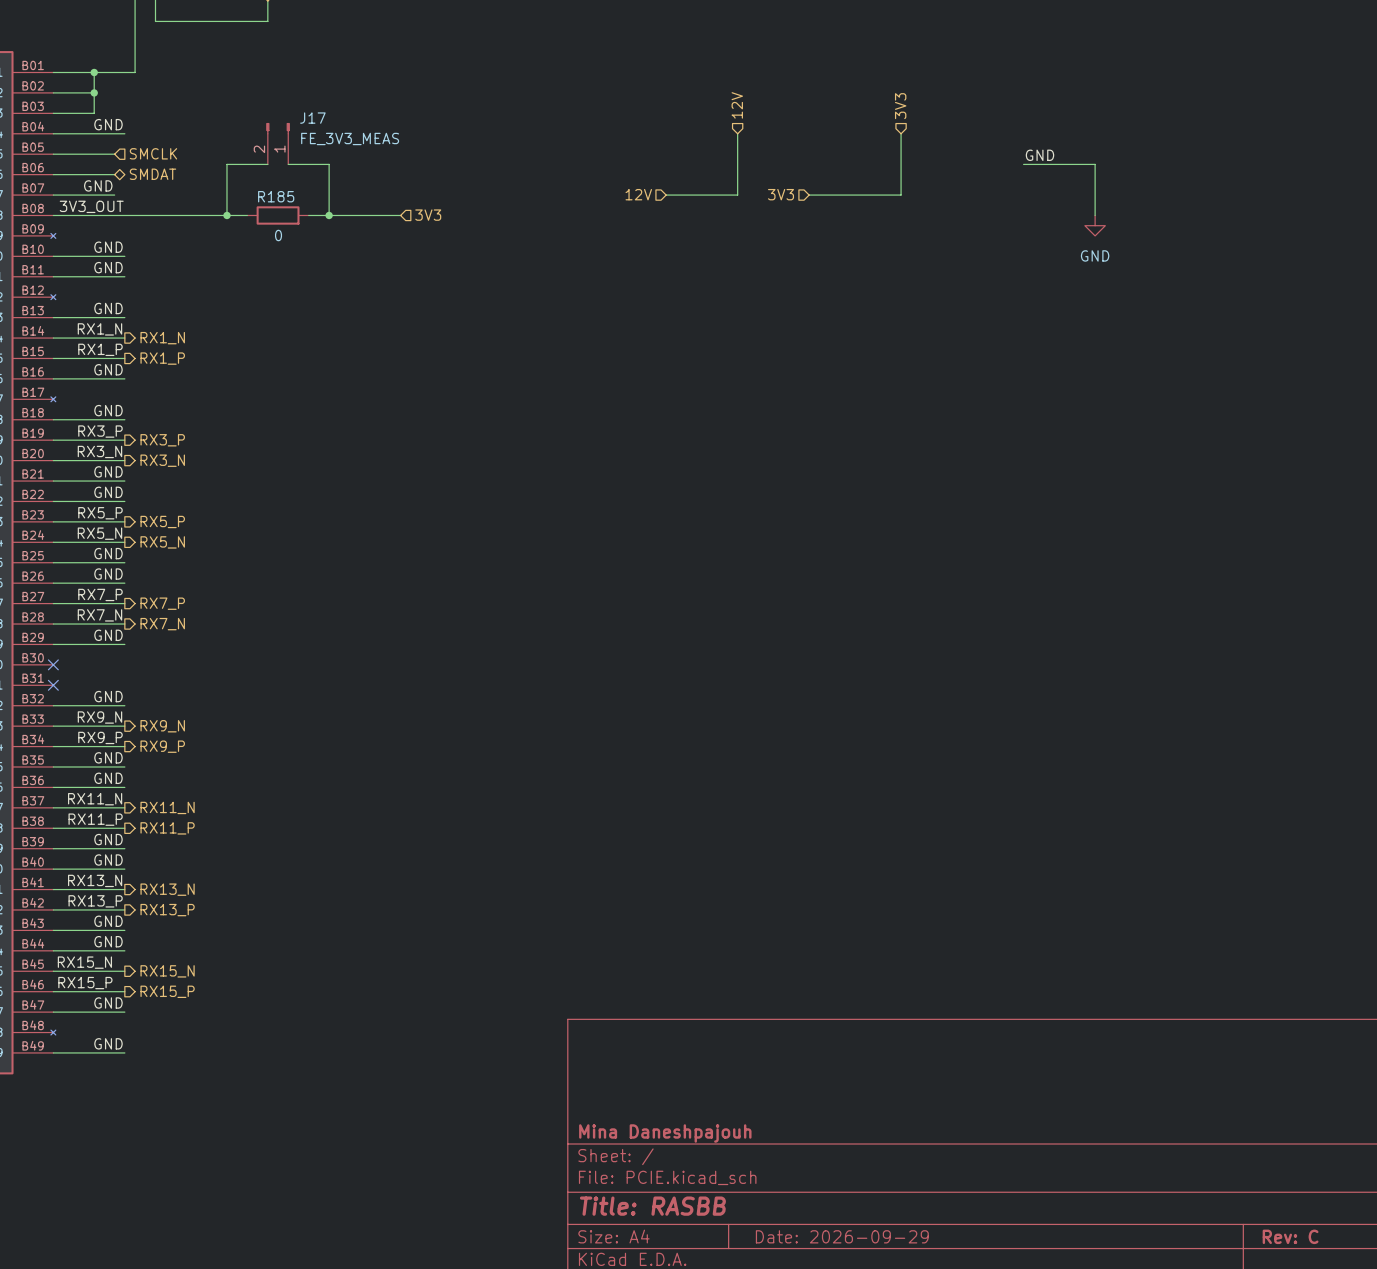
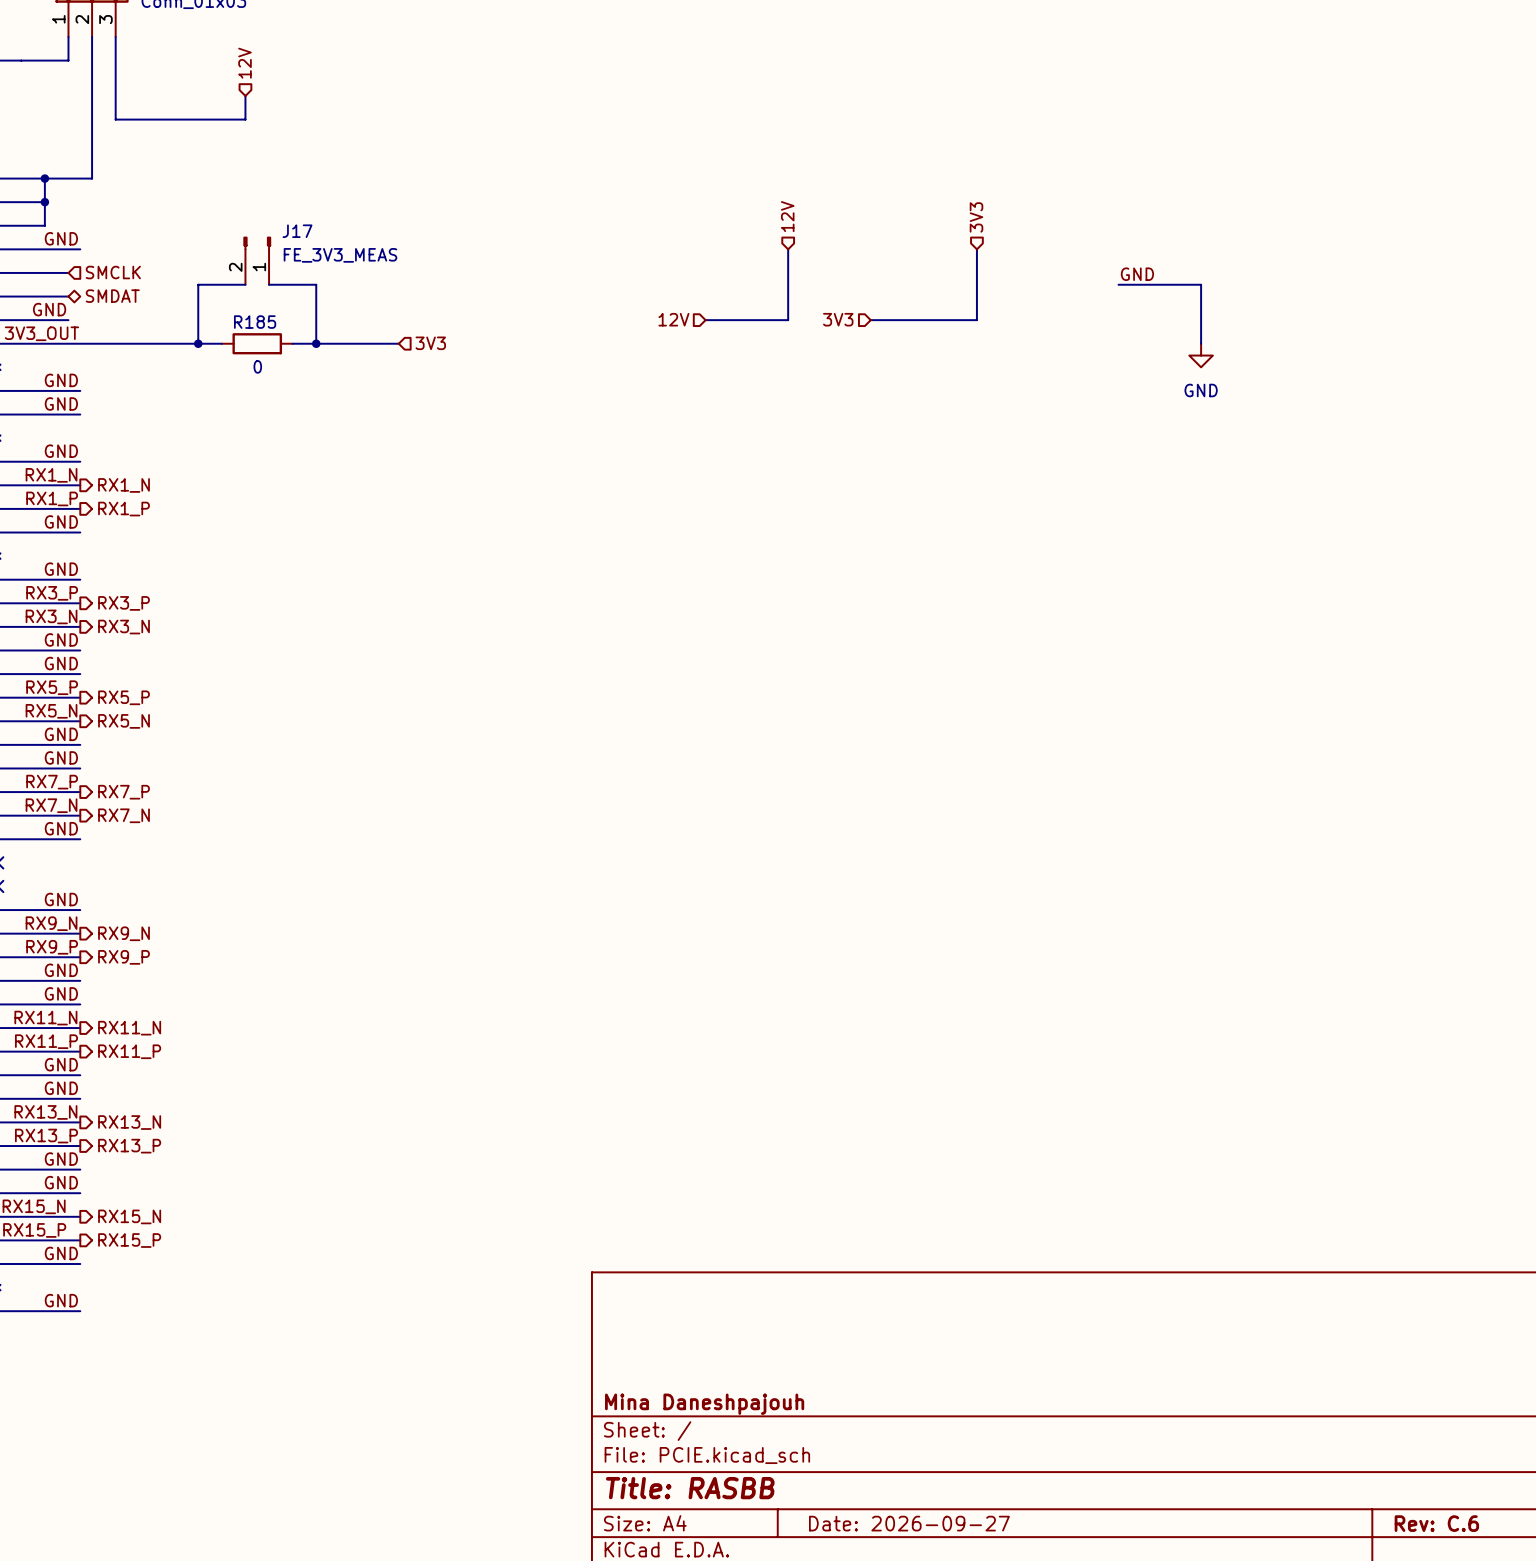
title block: Date: 2026-09-29 (842, 1236) -> Date: 2026-09-27 (909, 1523)
title block: Rev: C (1290, 1236) -> Rev: C.6 (1436, 1523)

